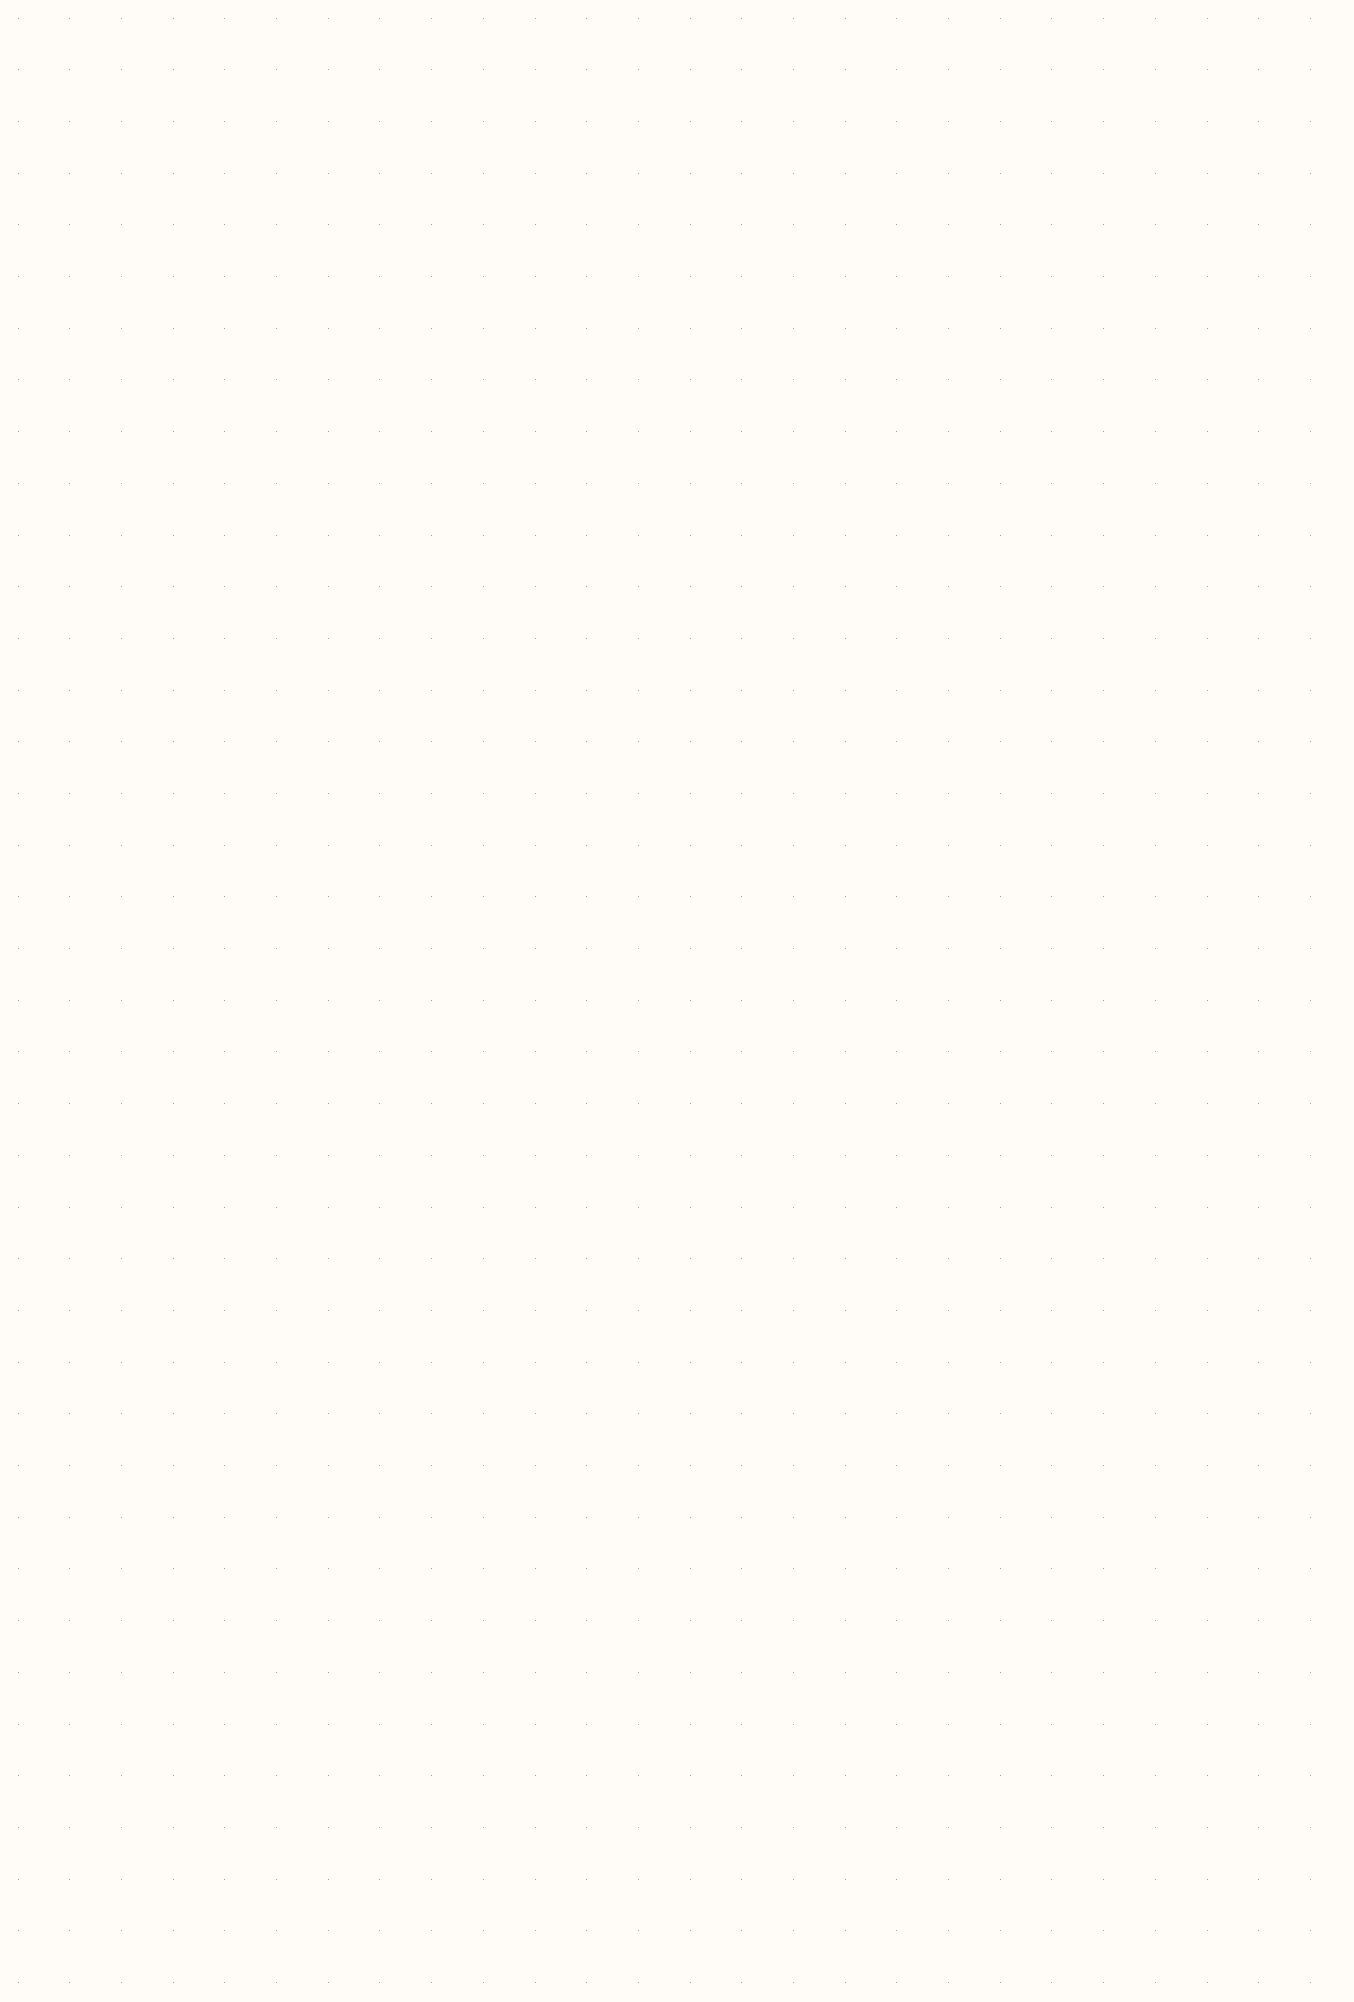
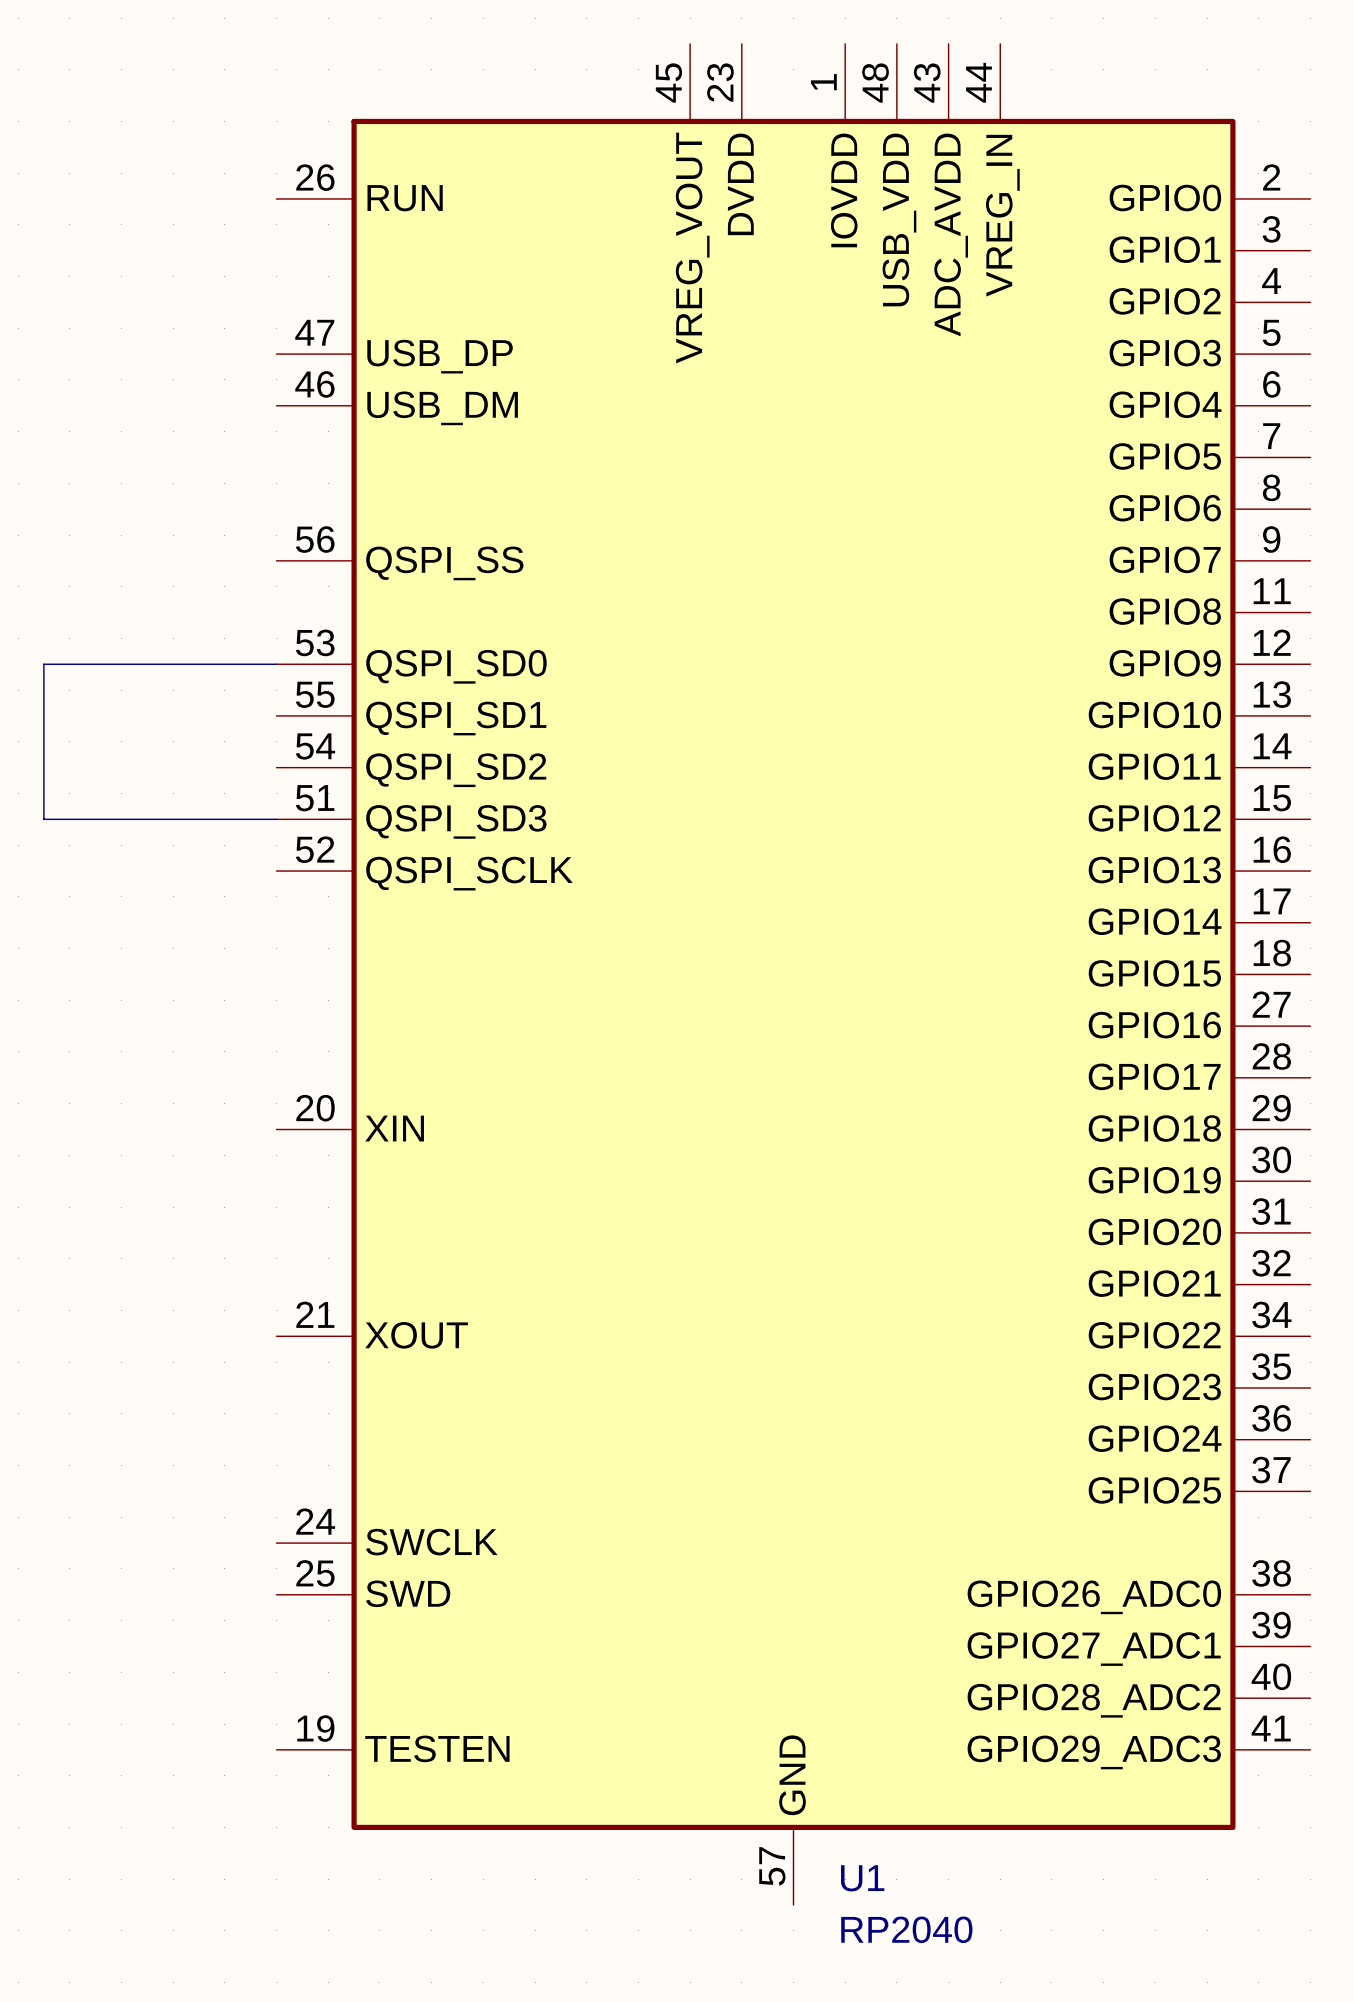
wire: none -> (276, 664) (43, 664) (43, 819) (276, 819)
U1: none -> RP2040 (793, 974)

